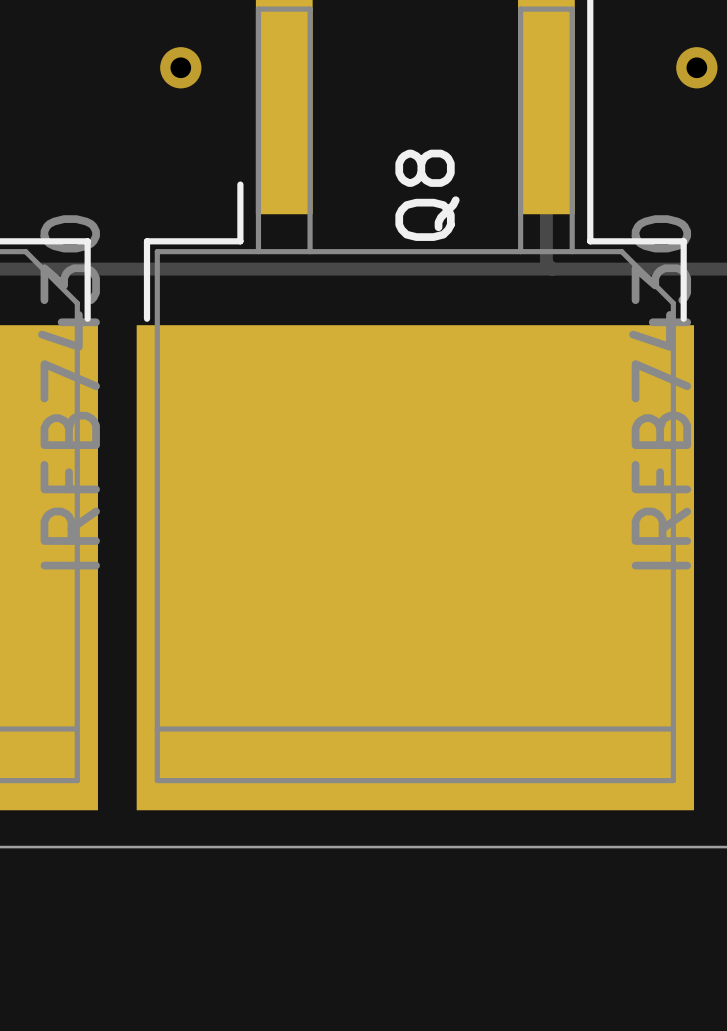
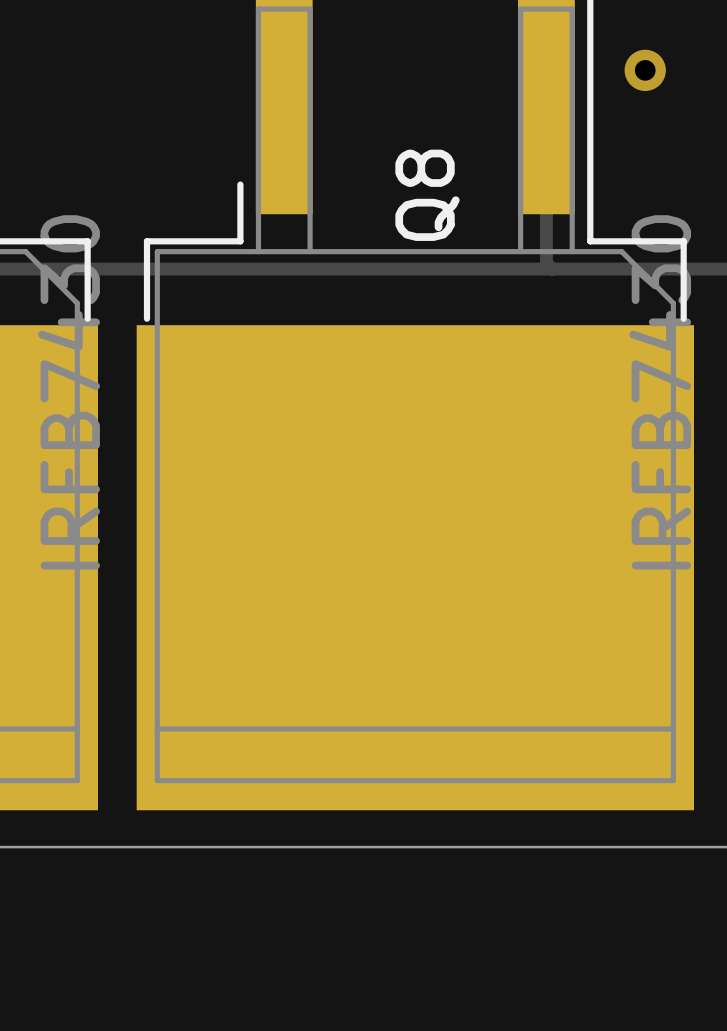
via: (180, 67) -> none
via position: (696, 67) -> (645, 70)

